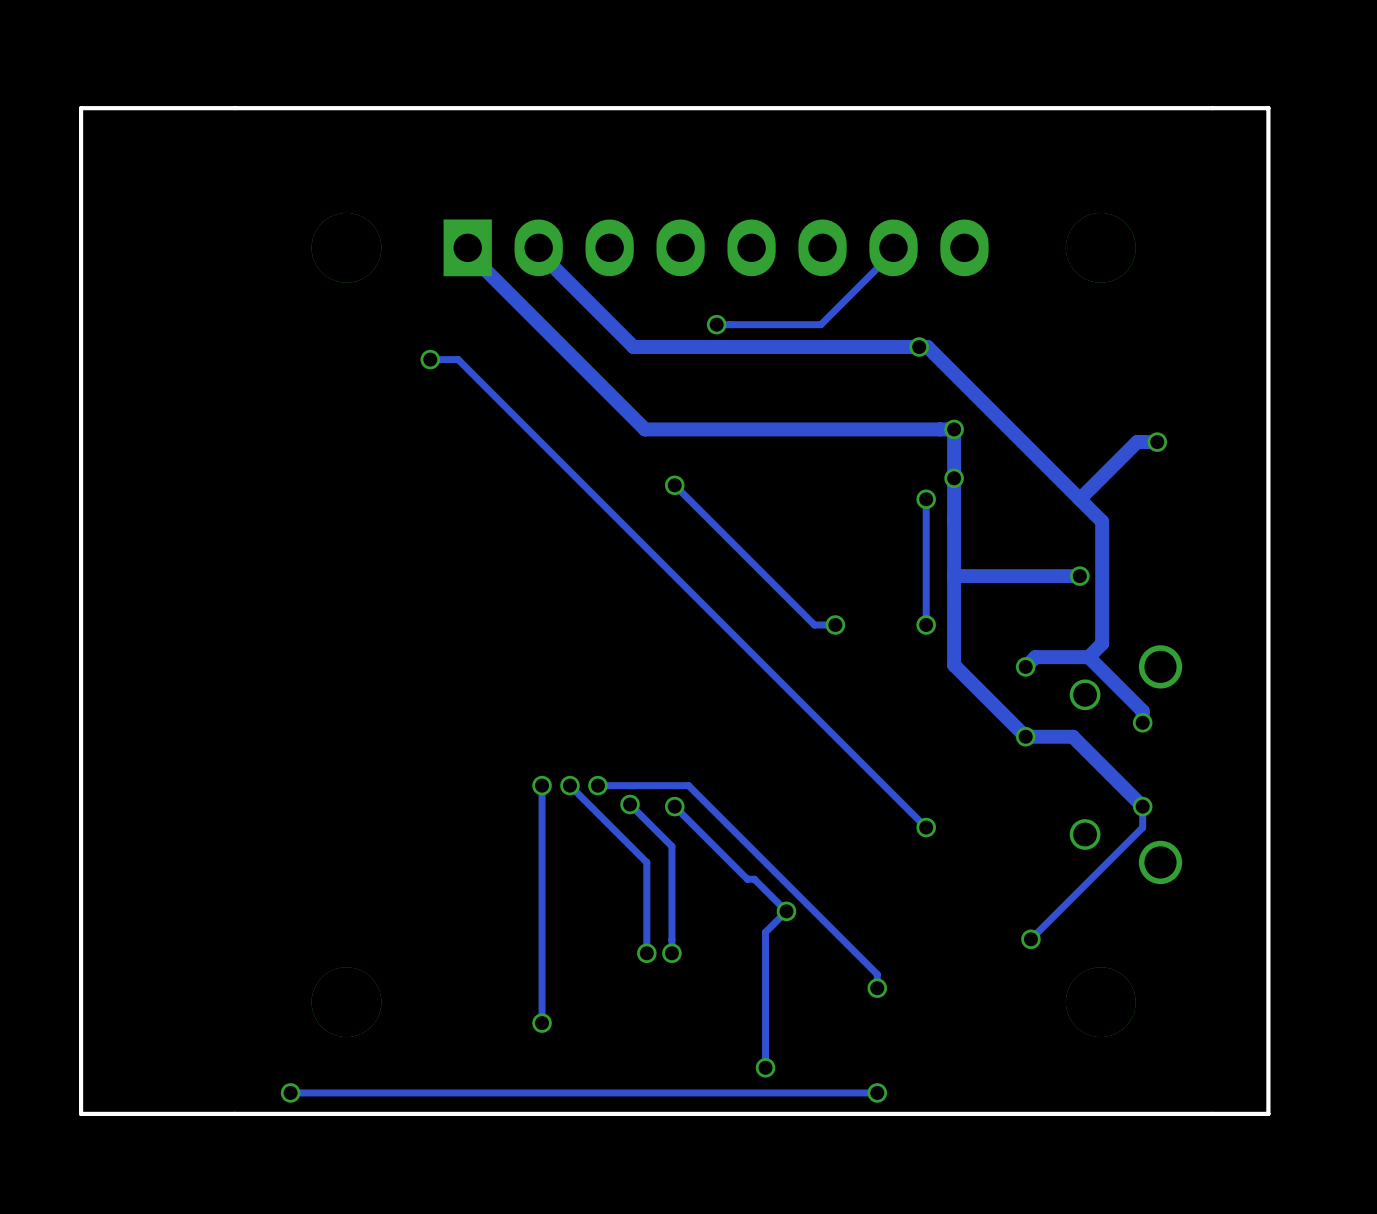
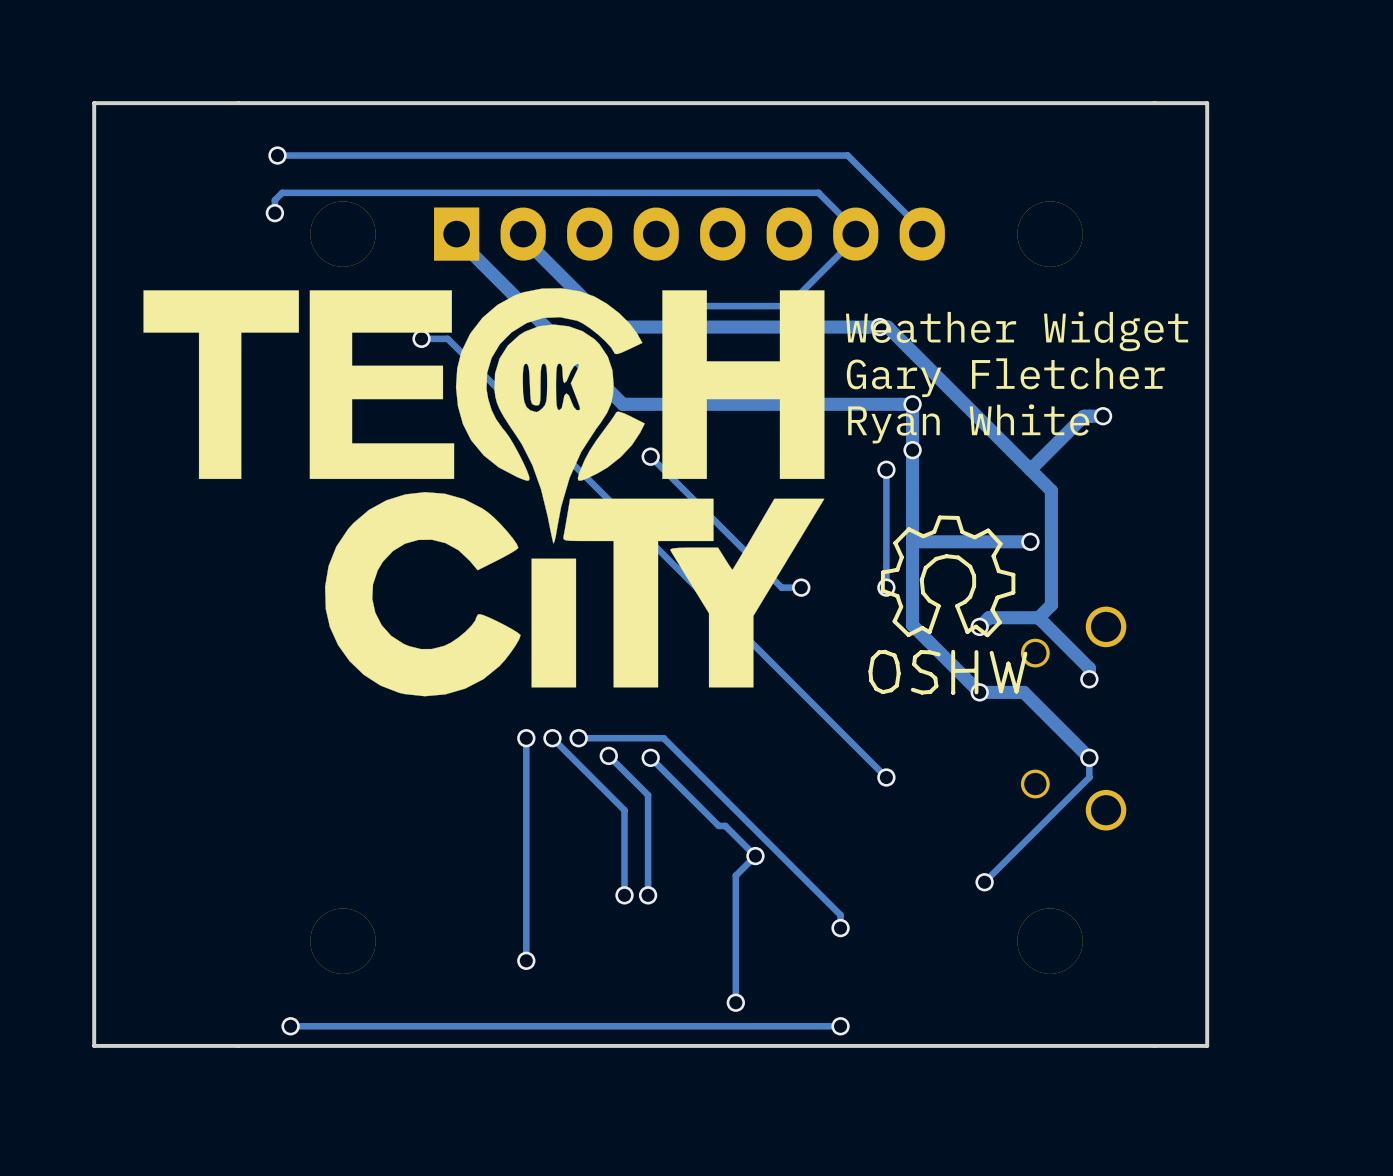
track: none -> (277, 155) (847, 155) (922, 230) (922, 234)
via: none -> (277, 155)
track: none -> (274, 213) (274, 200) (282, 192) (818, 192) (855, 230) (855, 234)
via: none -> (274, 213)
drawing: none -> [143, 288, 825, 697]
text: none -> Weather Widget (1017, 331)
text: none -> Gary Fletcher (1005, 377)
text: none -> Ryan White (968, 423)
drawing: none -> [868, 515, 1028, 695]

